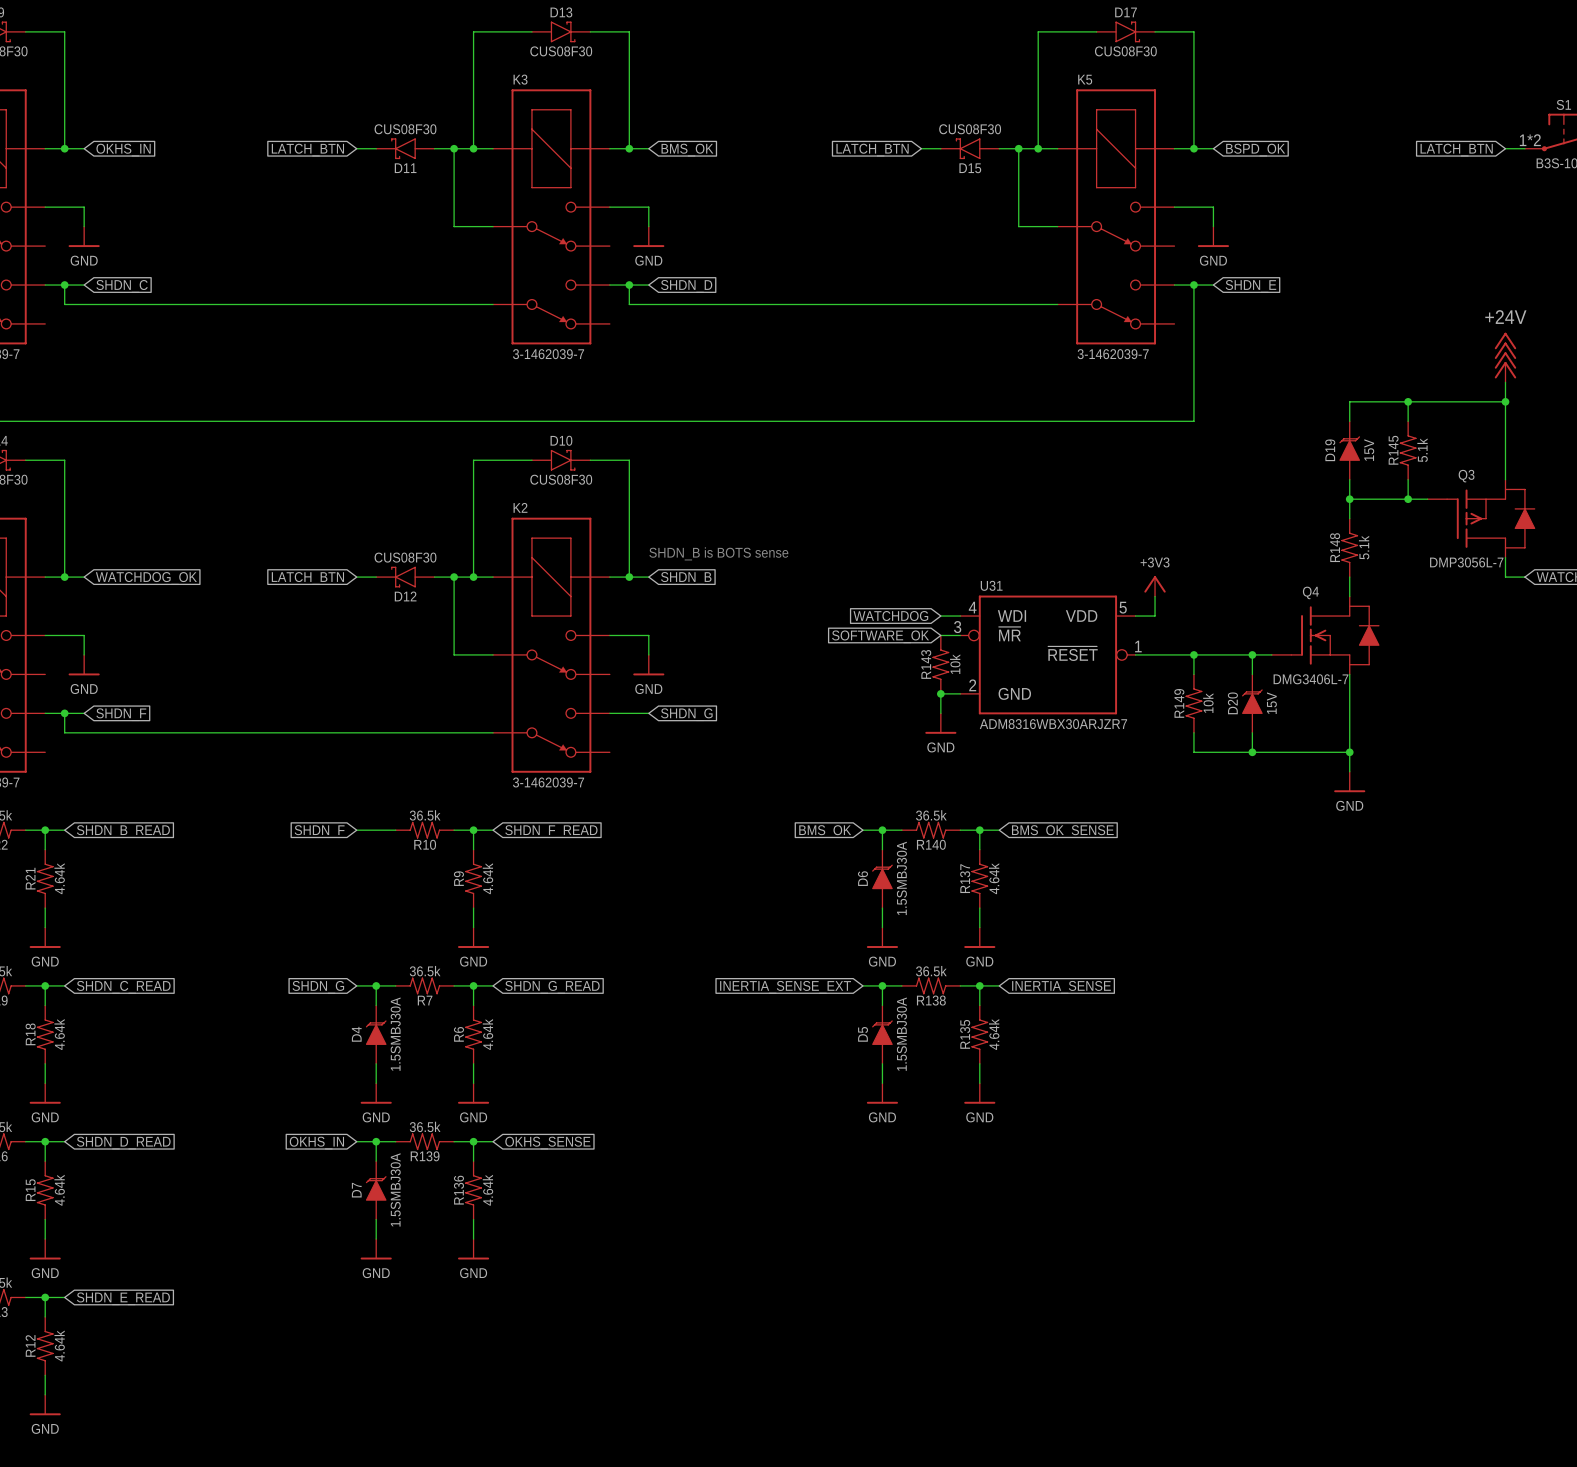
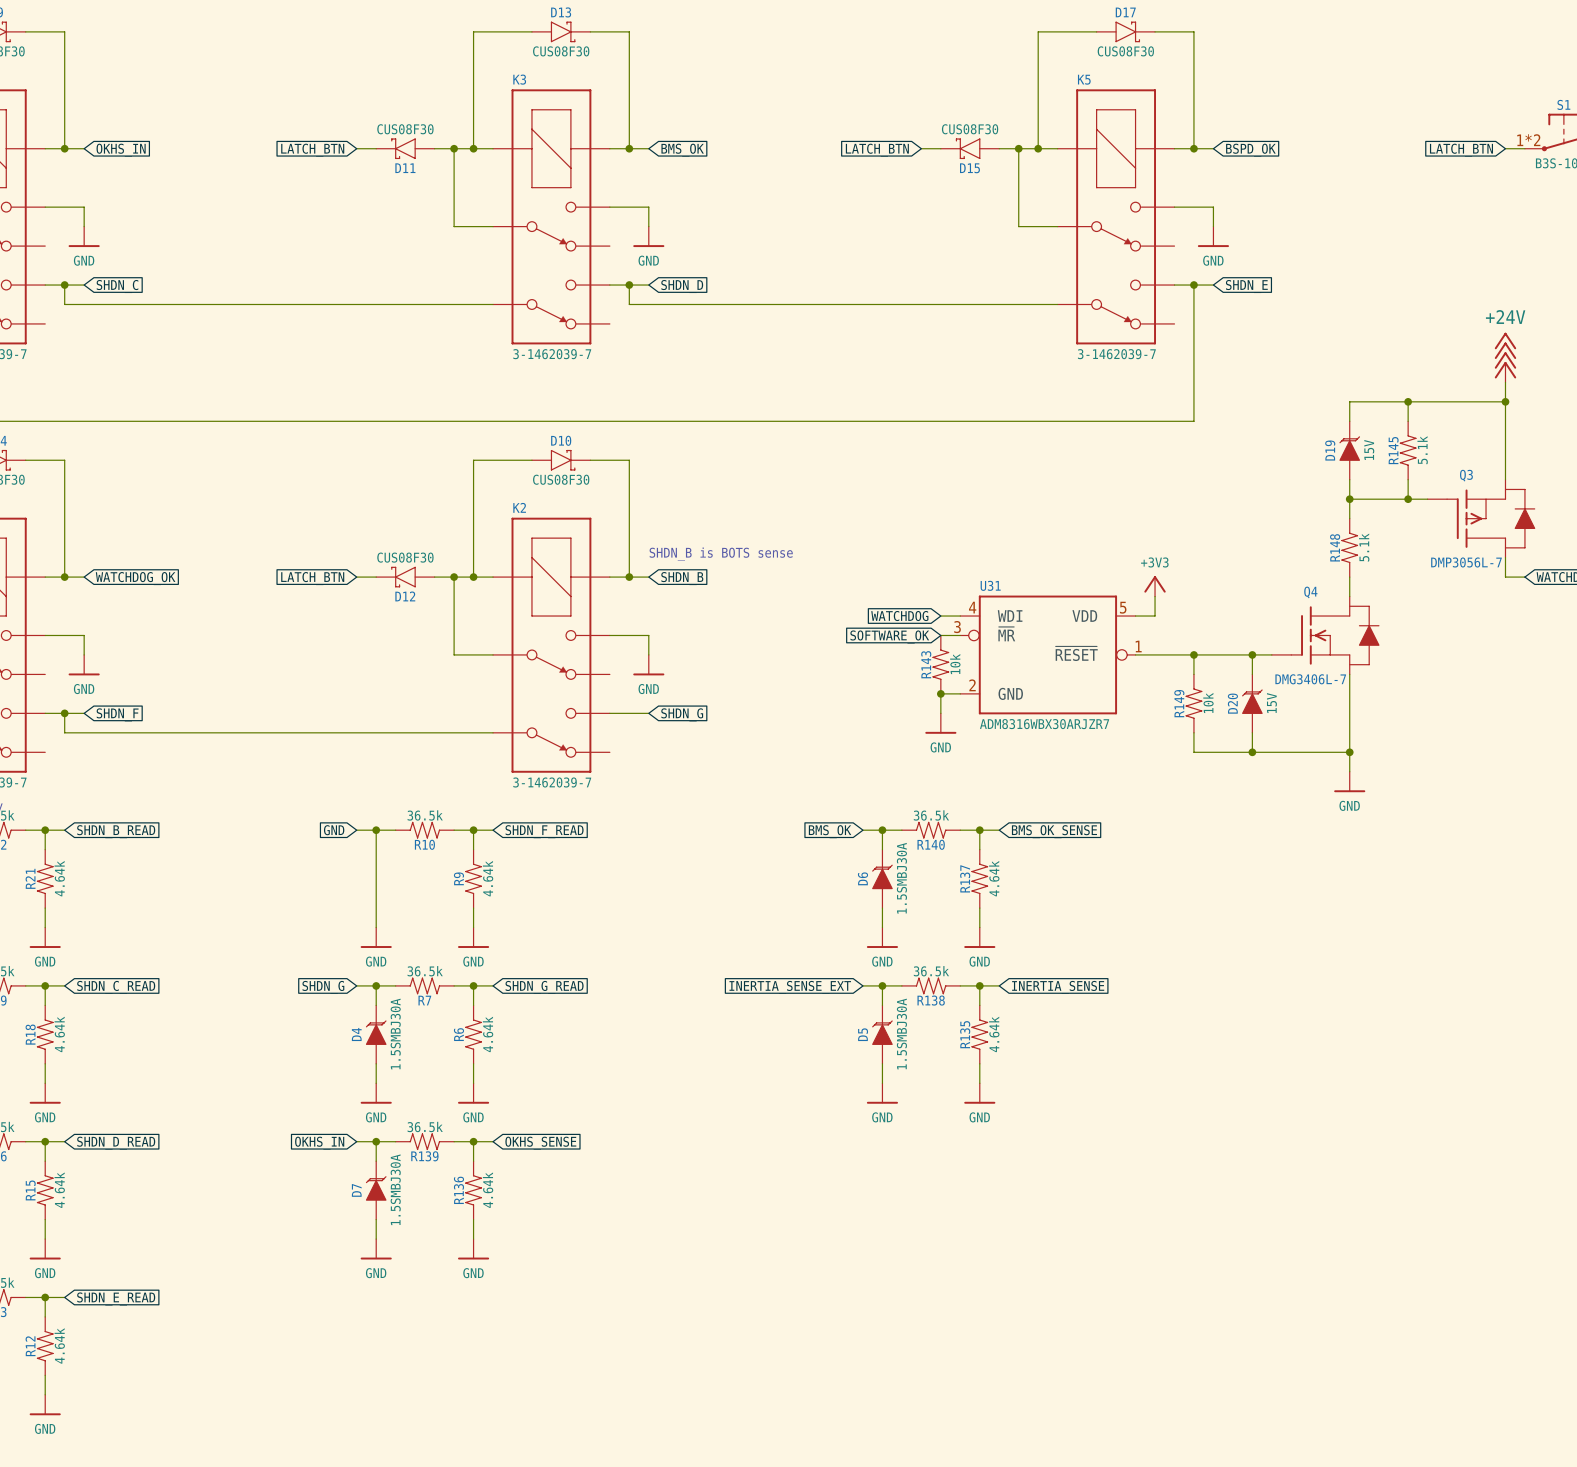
wire: none -> (376, 830) (376, 927)
junction: none -> (376, 830)
global label: SHDN_F (319, 831) -> GND (334, 830)
power symbol: none -> GND (376, 937)

